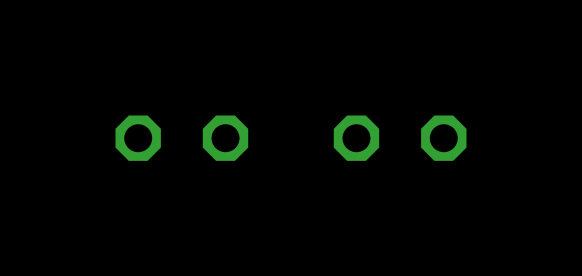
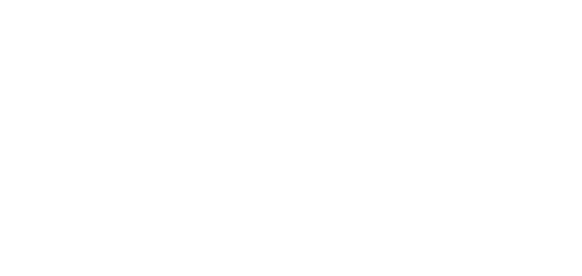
part: (181, 138) -> none
part: (400, 138) -> none

